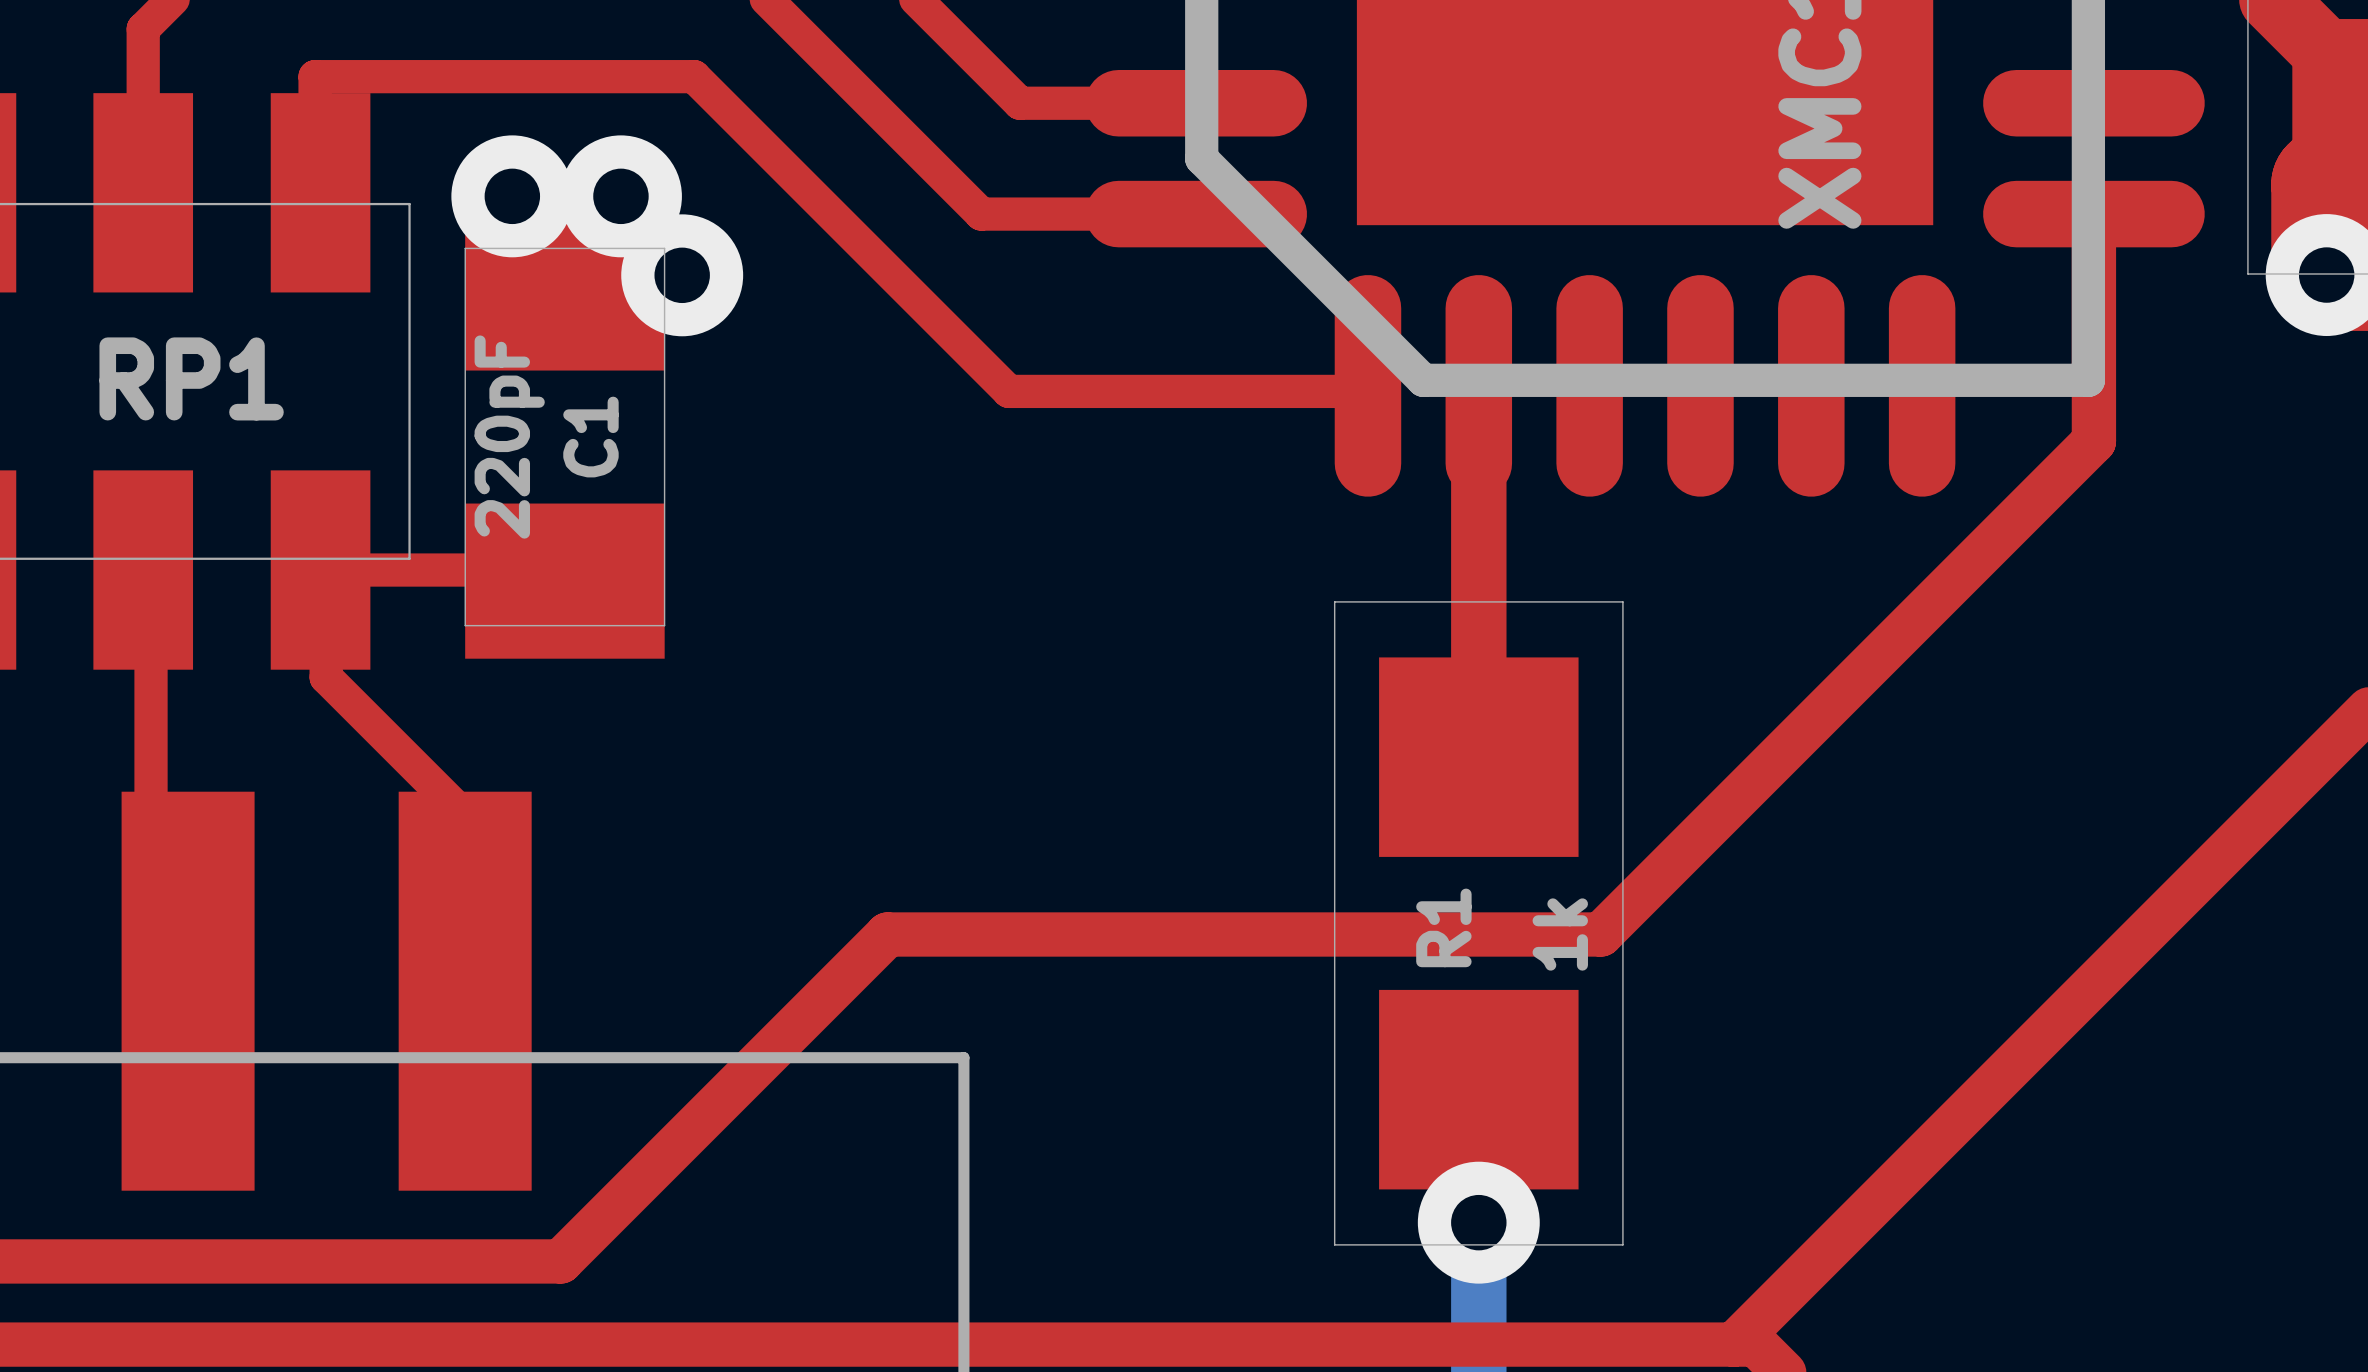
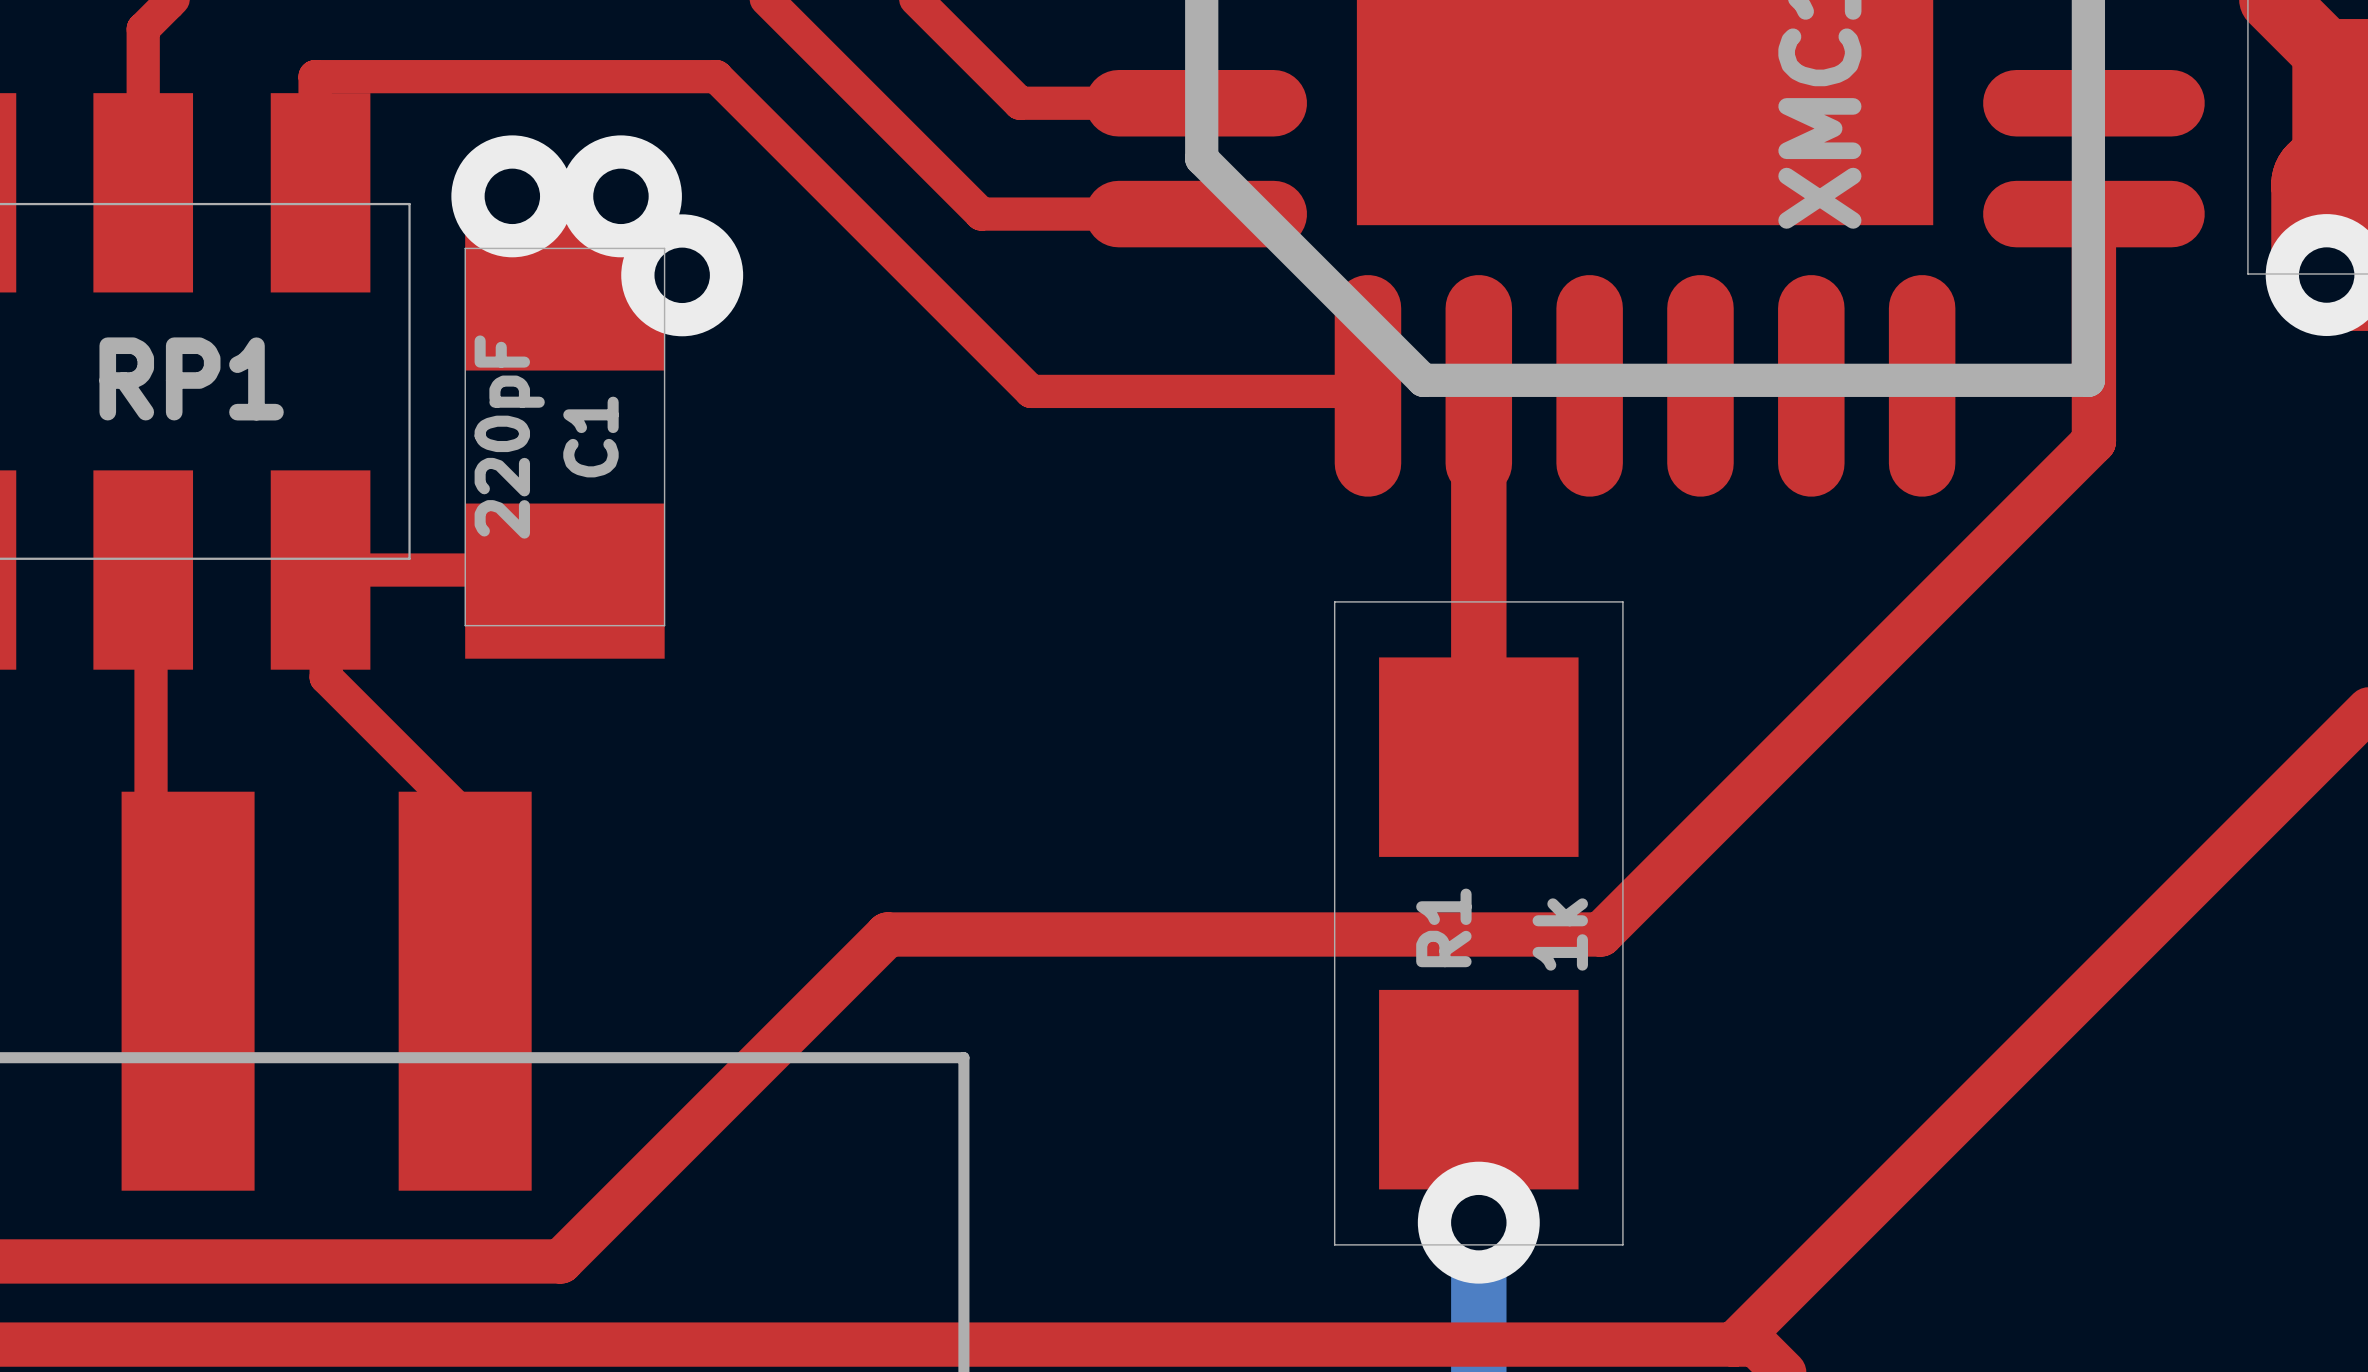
top track: (694, 76) (1008, 391) (1031, 391) -> (694, 76) (716, 76) (1031, 391)

